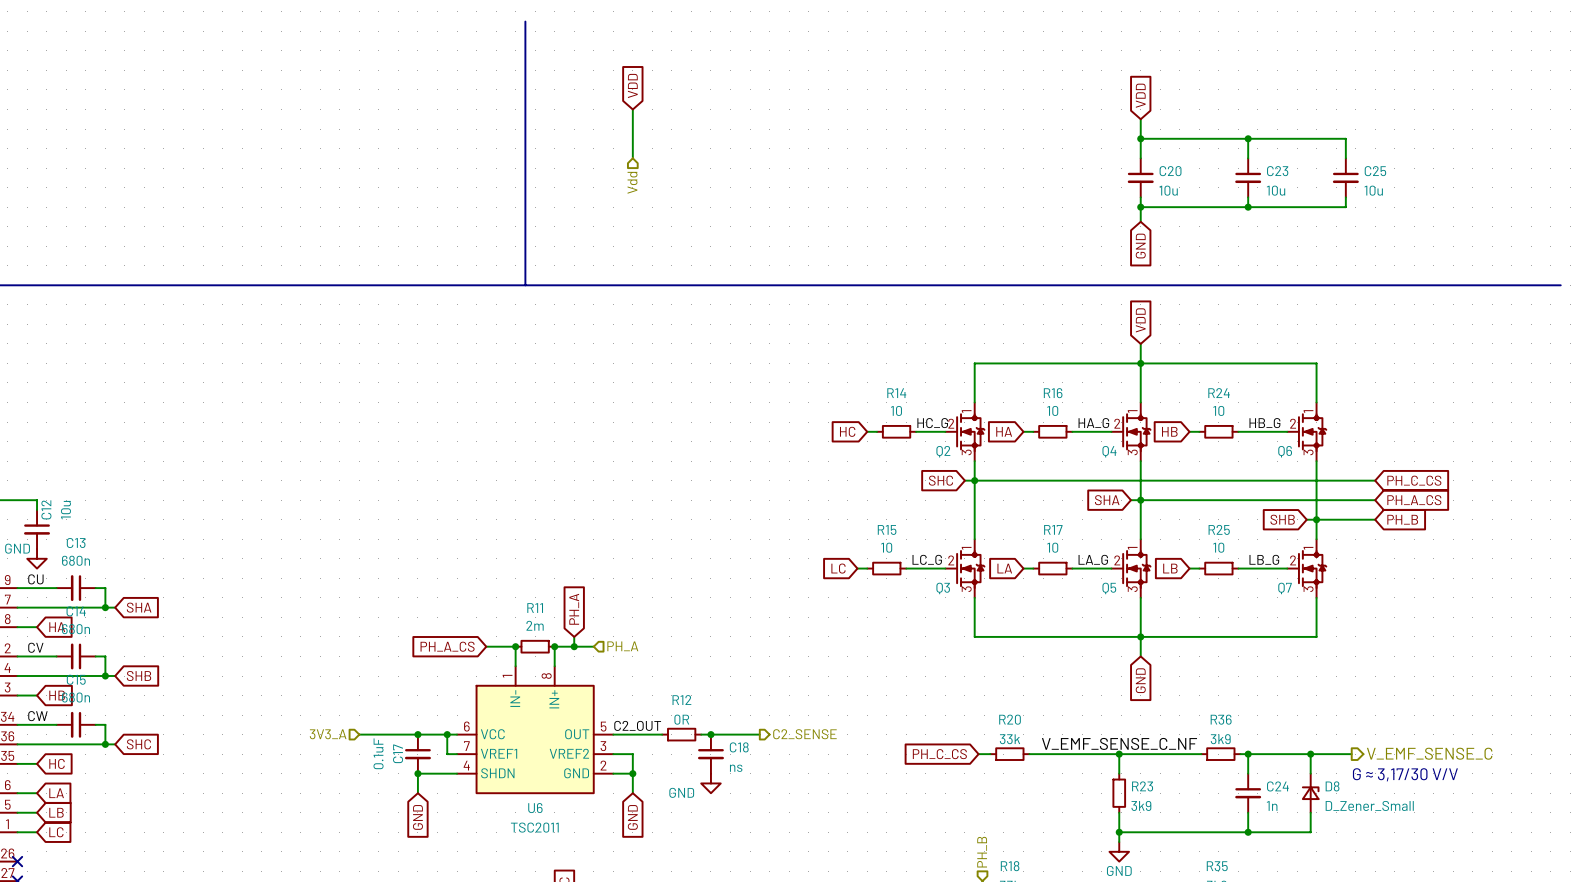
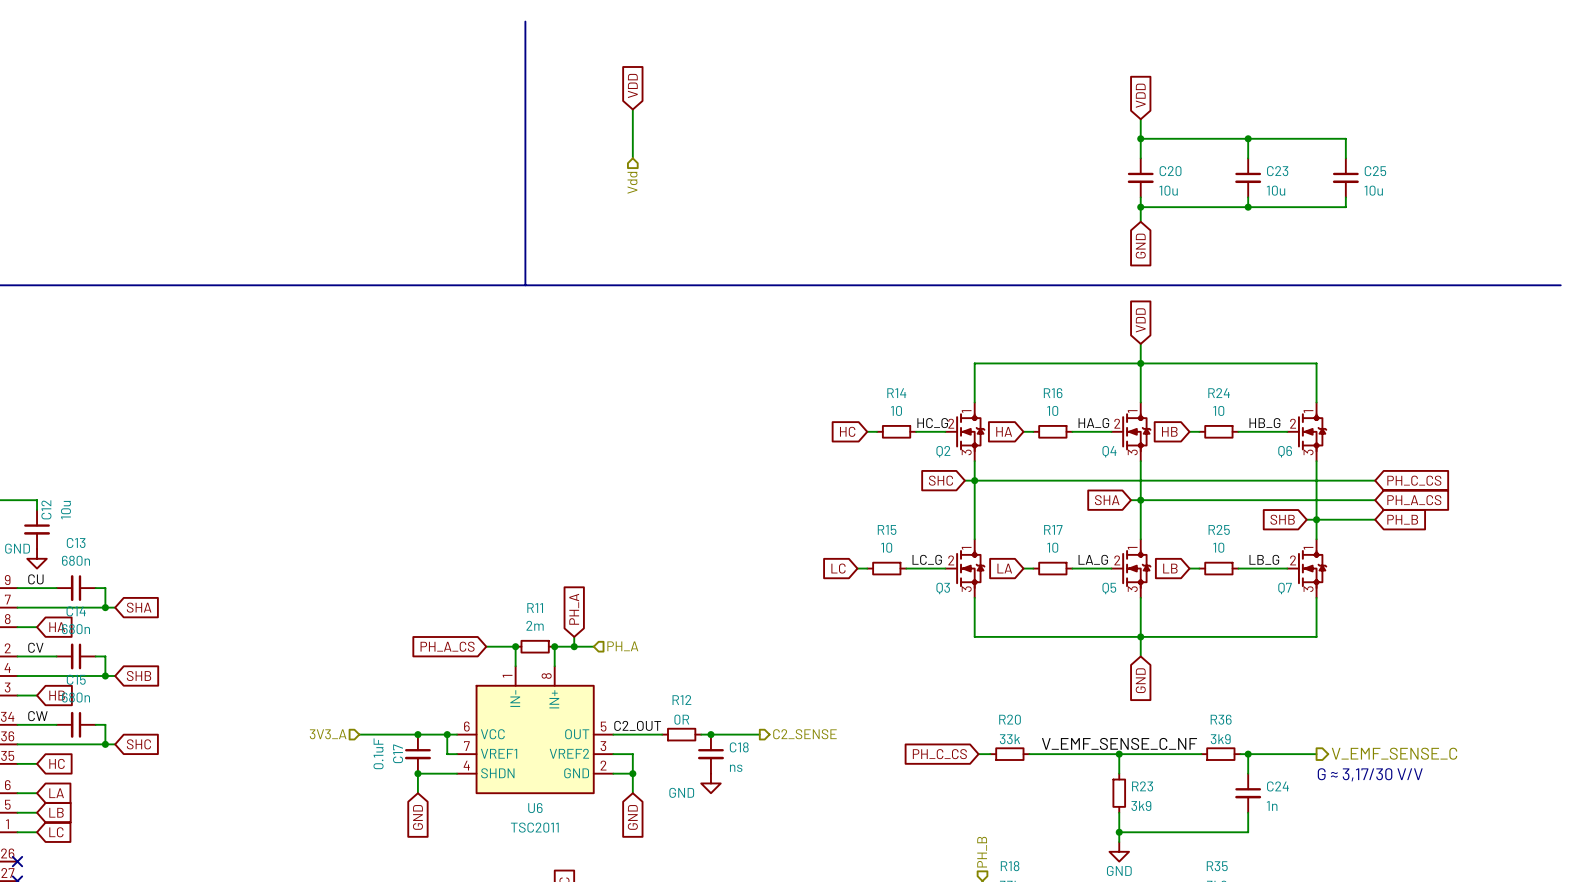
hierarchical label position: V_EMF_SENSE_C (1429, 753) -> V_EMF_SENSE_C (1394, 753)
wire: (1310, 754) (1310, 773) -> none
junction: (1310, 754) -> none
wire: (1316, 754) (1351, 754) -> none
text position: G ≈ 3,17/30 V/V (1405, 774) -> G ≈ 3,17/30 V/V (1370, 774)
D8: D_Zener_Small (1310, 793) -> none
wire: (1310, 812) (1310, 832) (1248, 832) -> none
junction: (1248, 832) -> none

